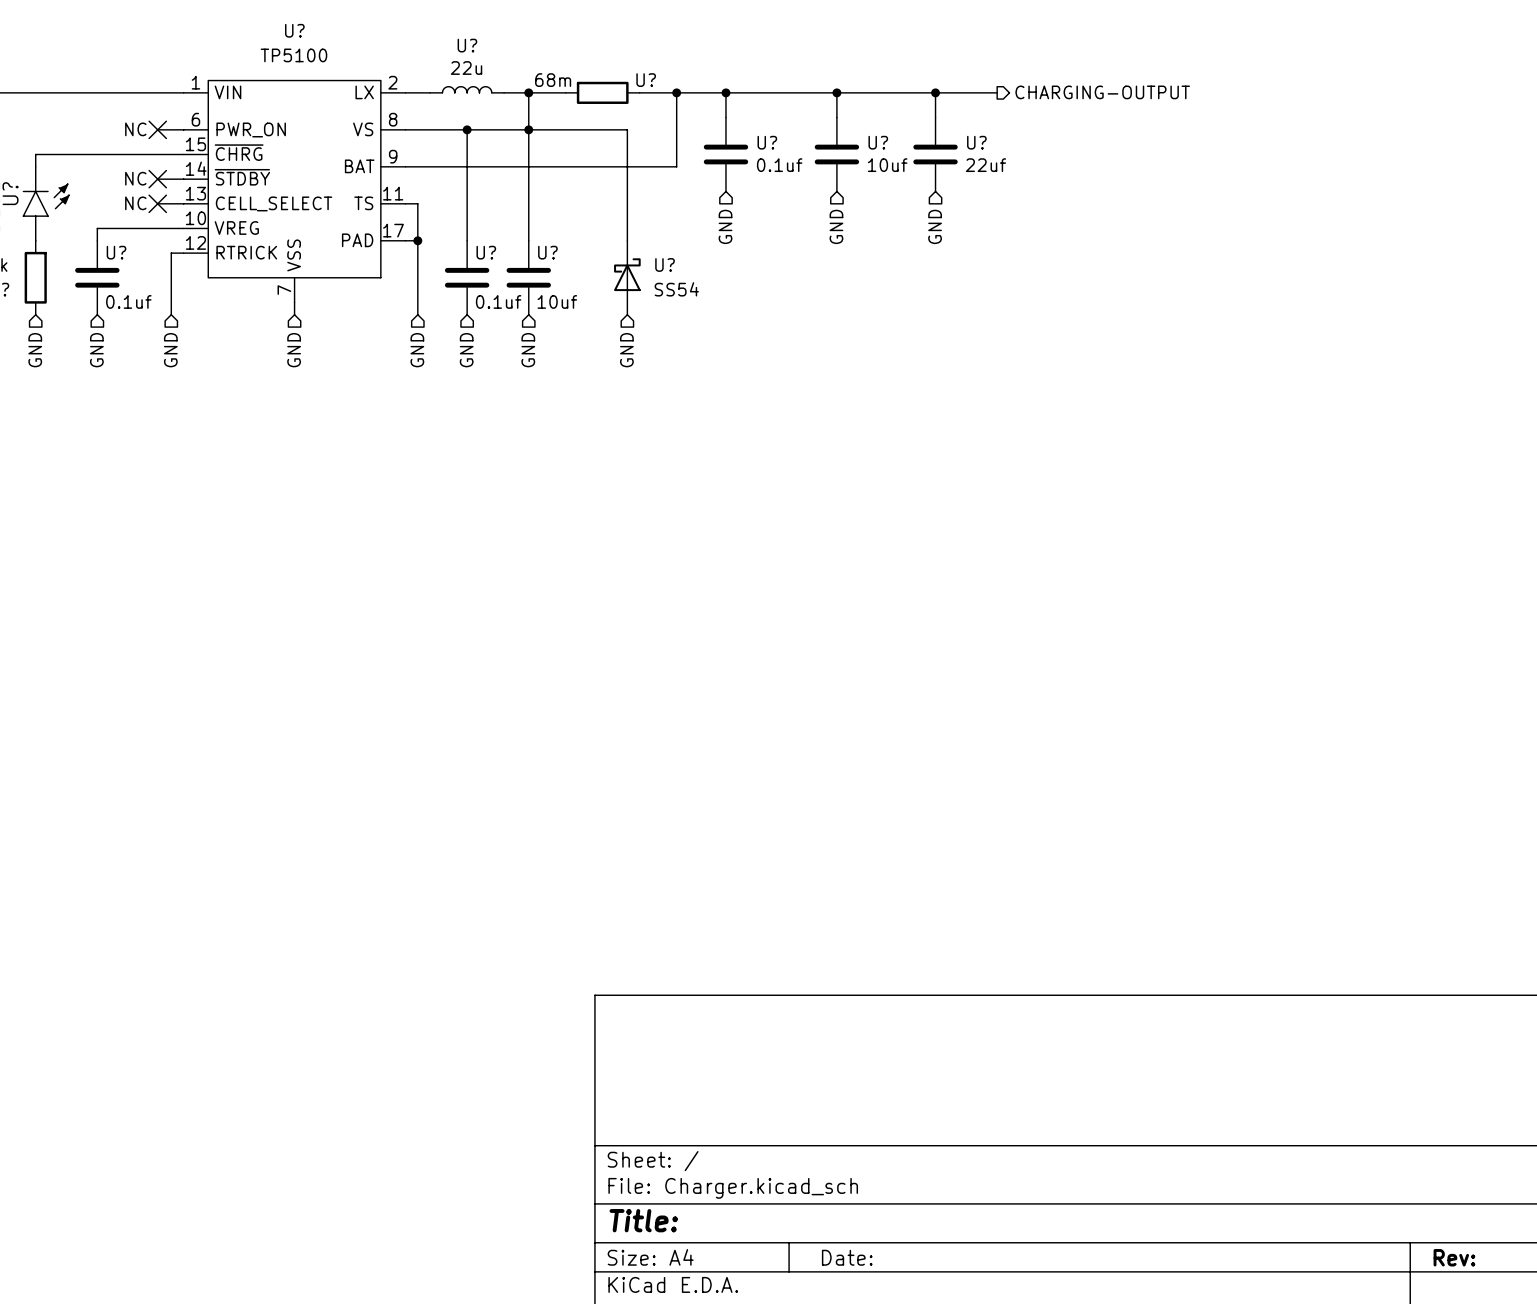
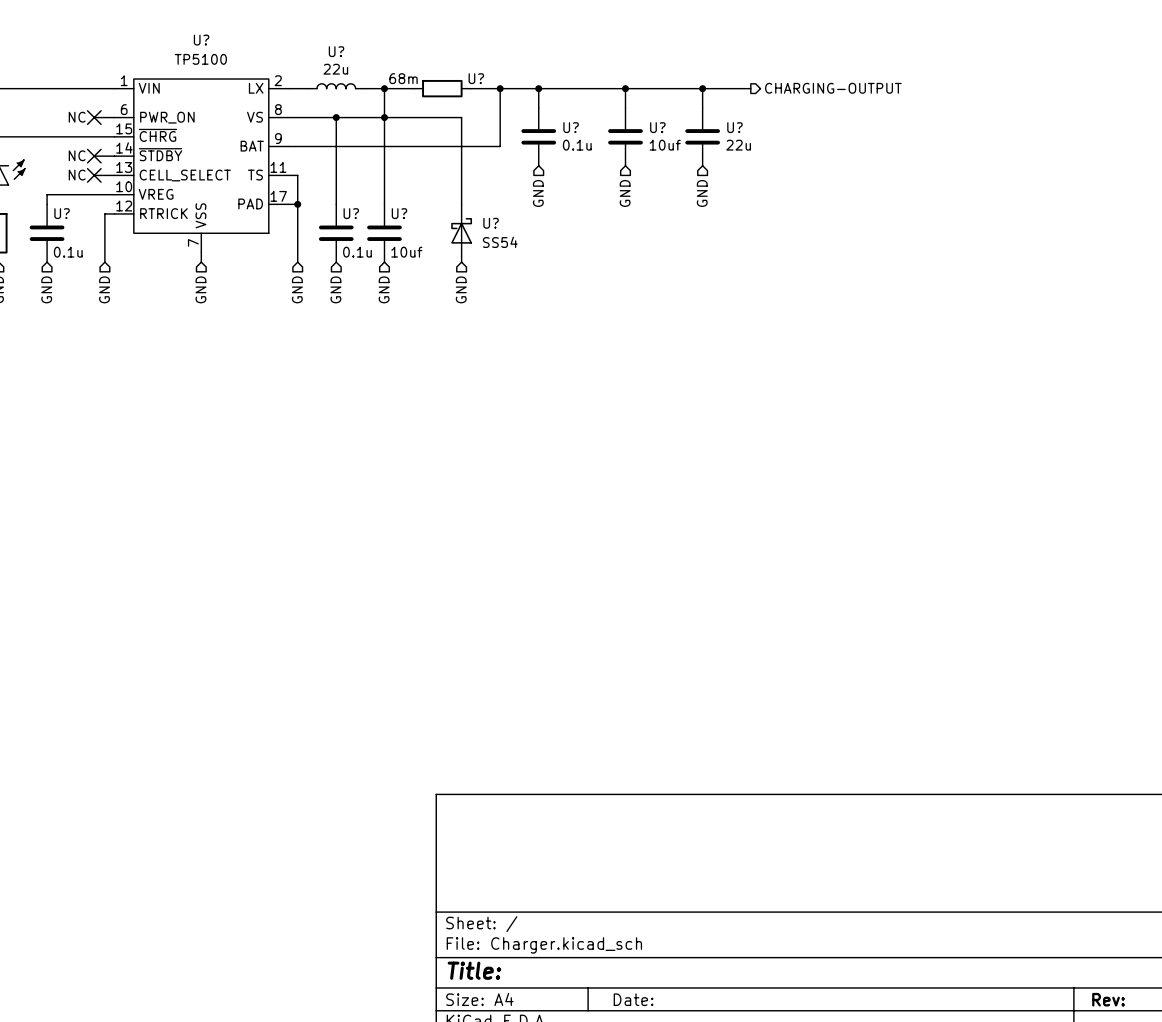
U? value: 0.1uf (779, 165) -> 0.1u (577, 145)
U? value: 22uf (985, 165) -> 22u (738, 145)
U? value: 0.1uf (128, 301) -> 0.1u (68, 252)
U? value: 0.1uf (498, 301) -> 0.1u (357, 252)

